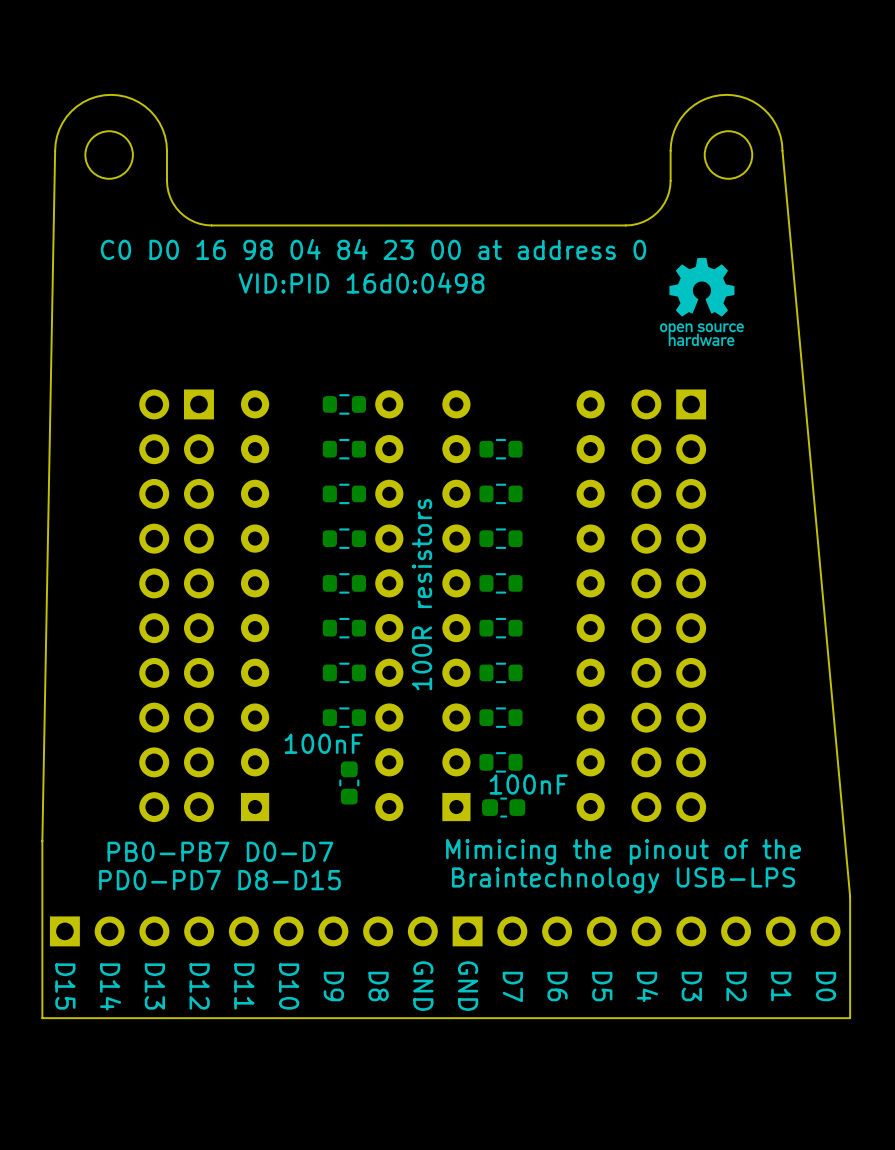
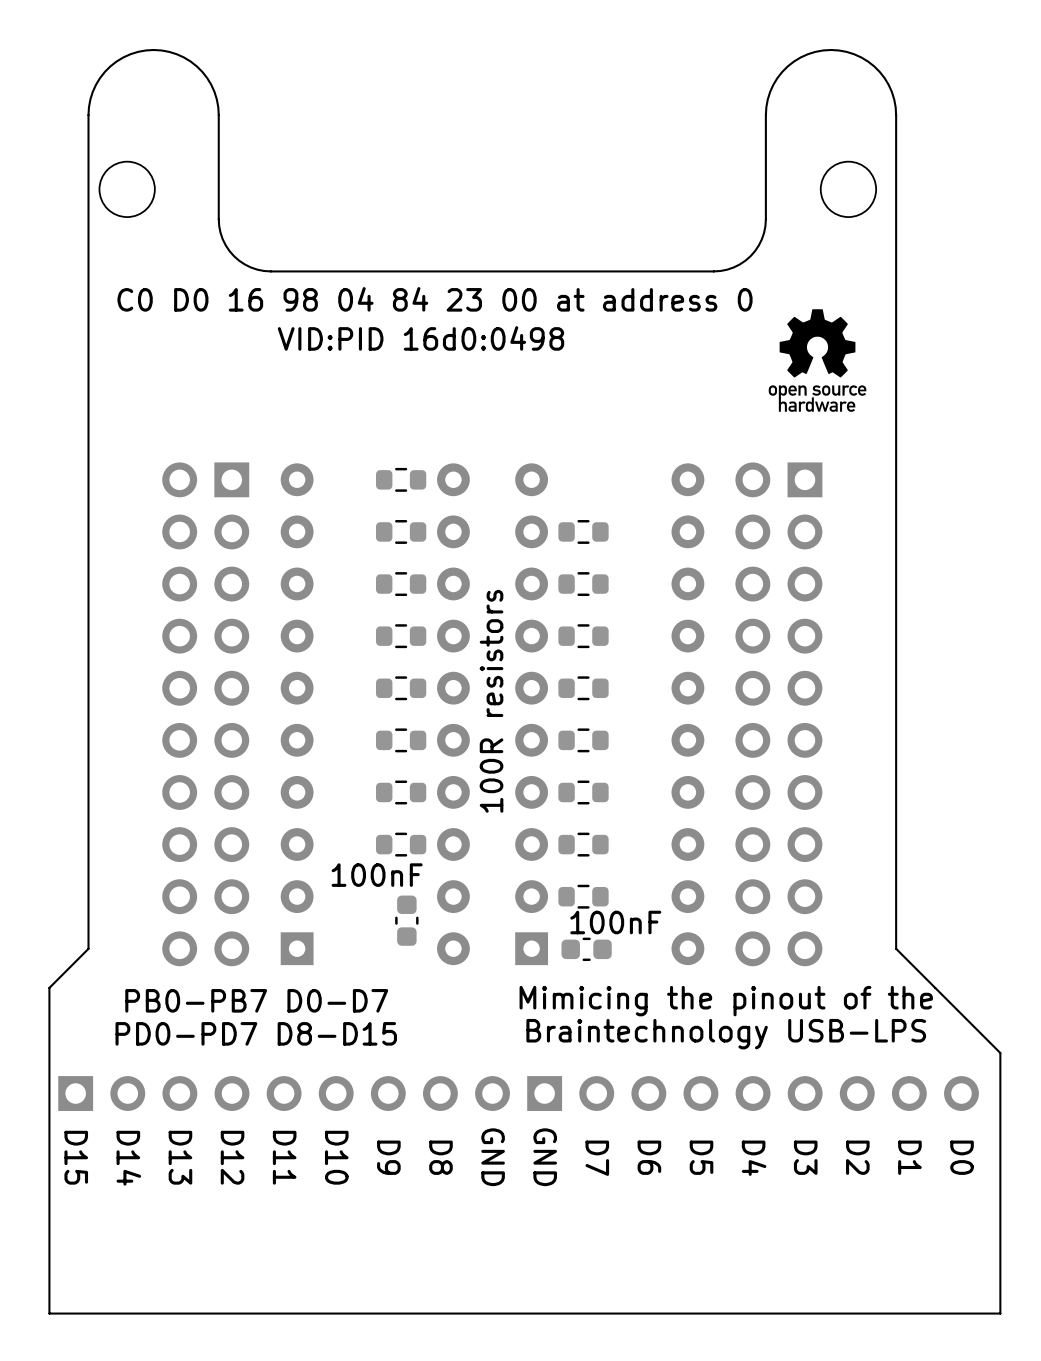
board edge: (232, 225) (200, 223) (189, 219) (176, 207) (170, 197) (167, 186) (166, 143) (162, 129) (150, 111) (139, 102) (118, 95) (96, 96) (77, 106) (62, 122) (57, 136) (55, 150) (42, 841) -> (270, 271) (257, 269) (239, 260) (229, 251) (220, 232) (218, 219) (218, 107) (214, 92) (207, 78) (190, 61) (169, 51) (153, 49) (138, 51) (116, 61) (104, 71) (95, 84) (90, 99) (88, 115) (88, 948) (49, 987)
board edge: (612, 225) (631, 225) (643, 222) (653, 216) (661, 207) (667, 197) (670, 186) (671, 144) (674, 130) (680, 119) (694, 104) (713, 96) (733, 95) (752, 101) (763, 108) (772, 119) (778, 130) (782, 144) (850, 896) (850, 1018) (42, 1018) -> (713, 271) (733, 267) (745, 260) (758, 245) (764, 232) (765, 219) (766, 107) (770, 92) (777, 78) (794, 61) (807, 54) (823, 50) (846, 51) (868, 61) (879, 71) (888, 84) (894, 99) (896, 115) (896, 948) (1000, 1053) (1000, 1313) (49, 1313) (49, 1194)

